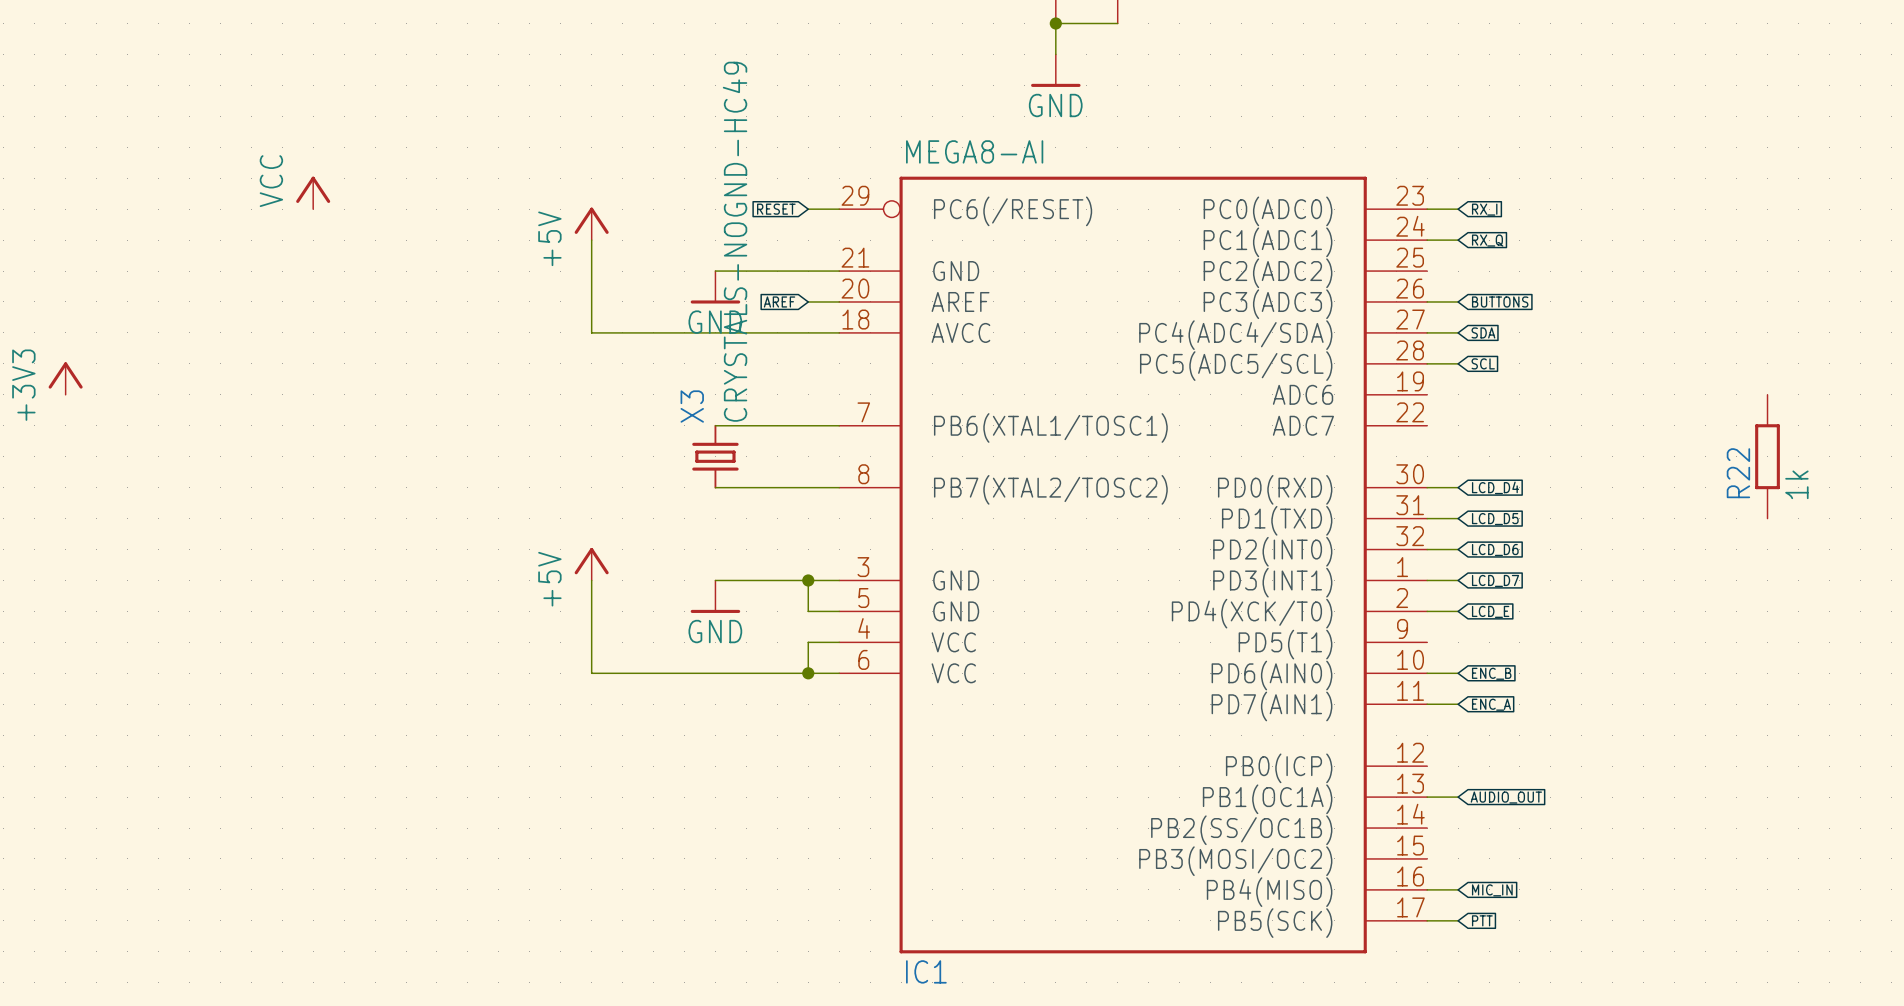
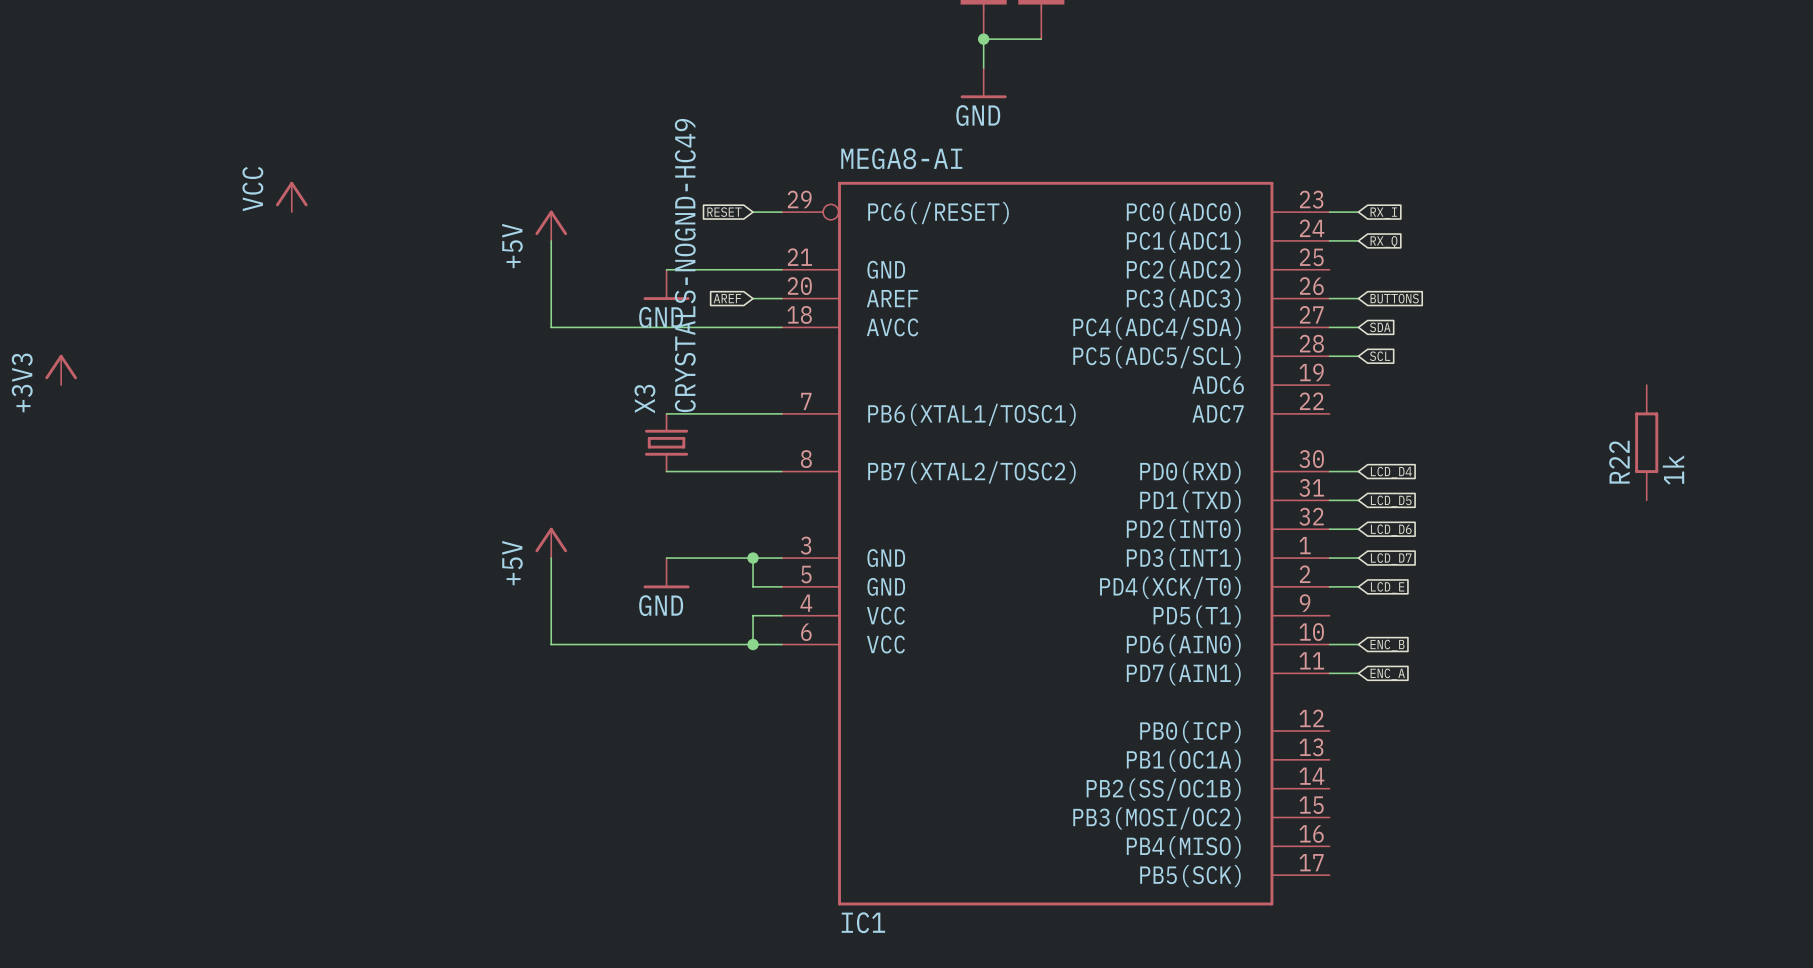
wire: (1427, 797) (1458, 797) -> none
global label: AUDIO_OUT (1506, 797) -> none
wire: (1427, 889) (1458, 889) -> none
global label: MIC_IN (1492, 890) -> none
wire: (1427, 920) (1458, 920) -> none
global label: PTT (1482, 920) -> none

